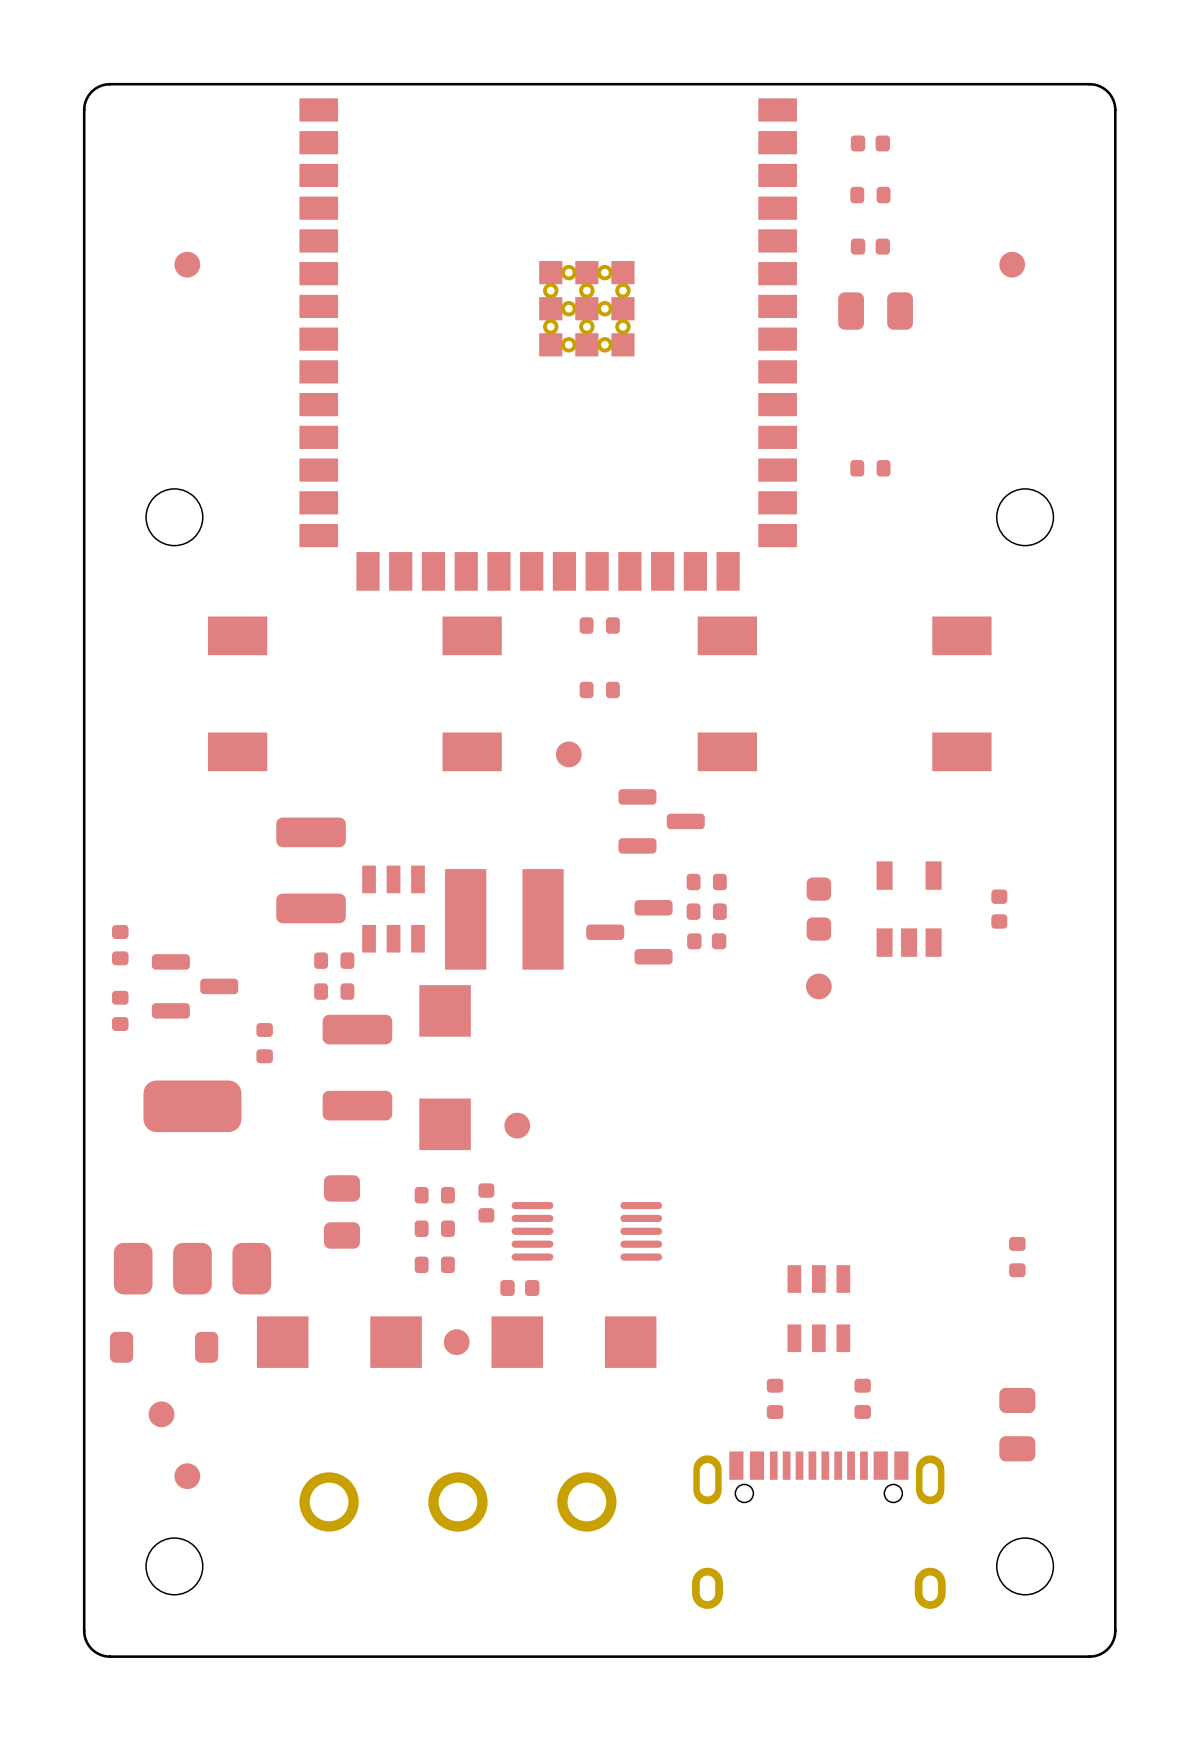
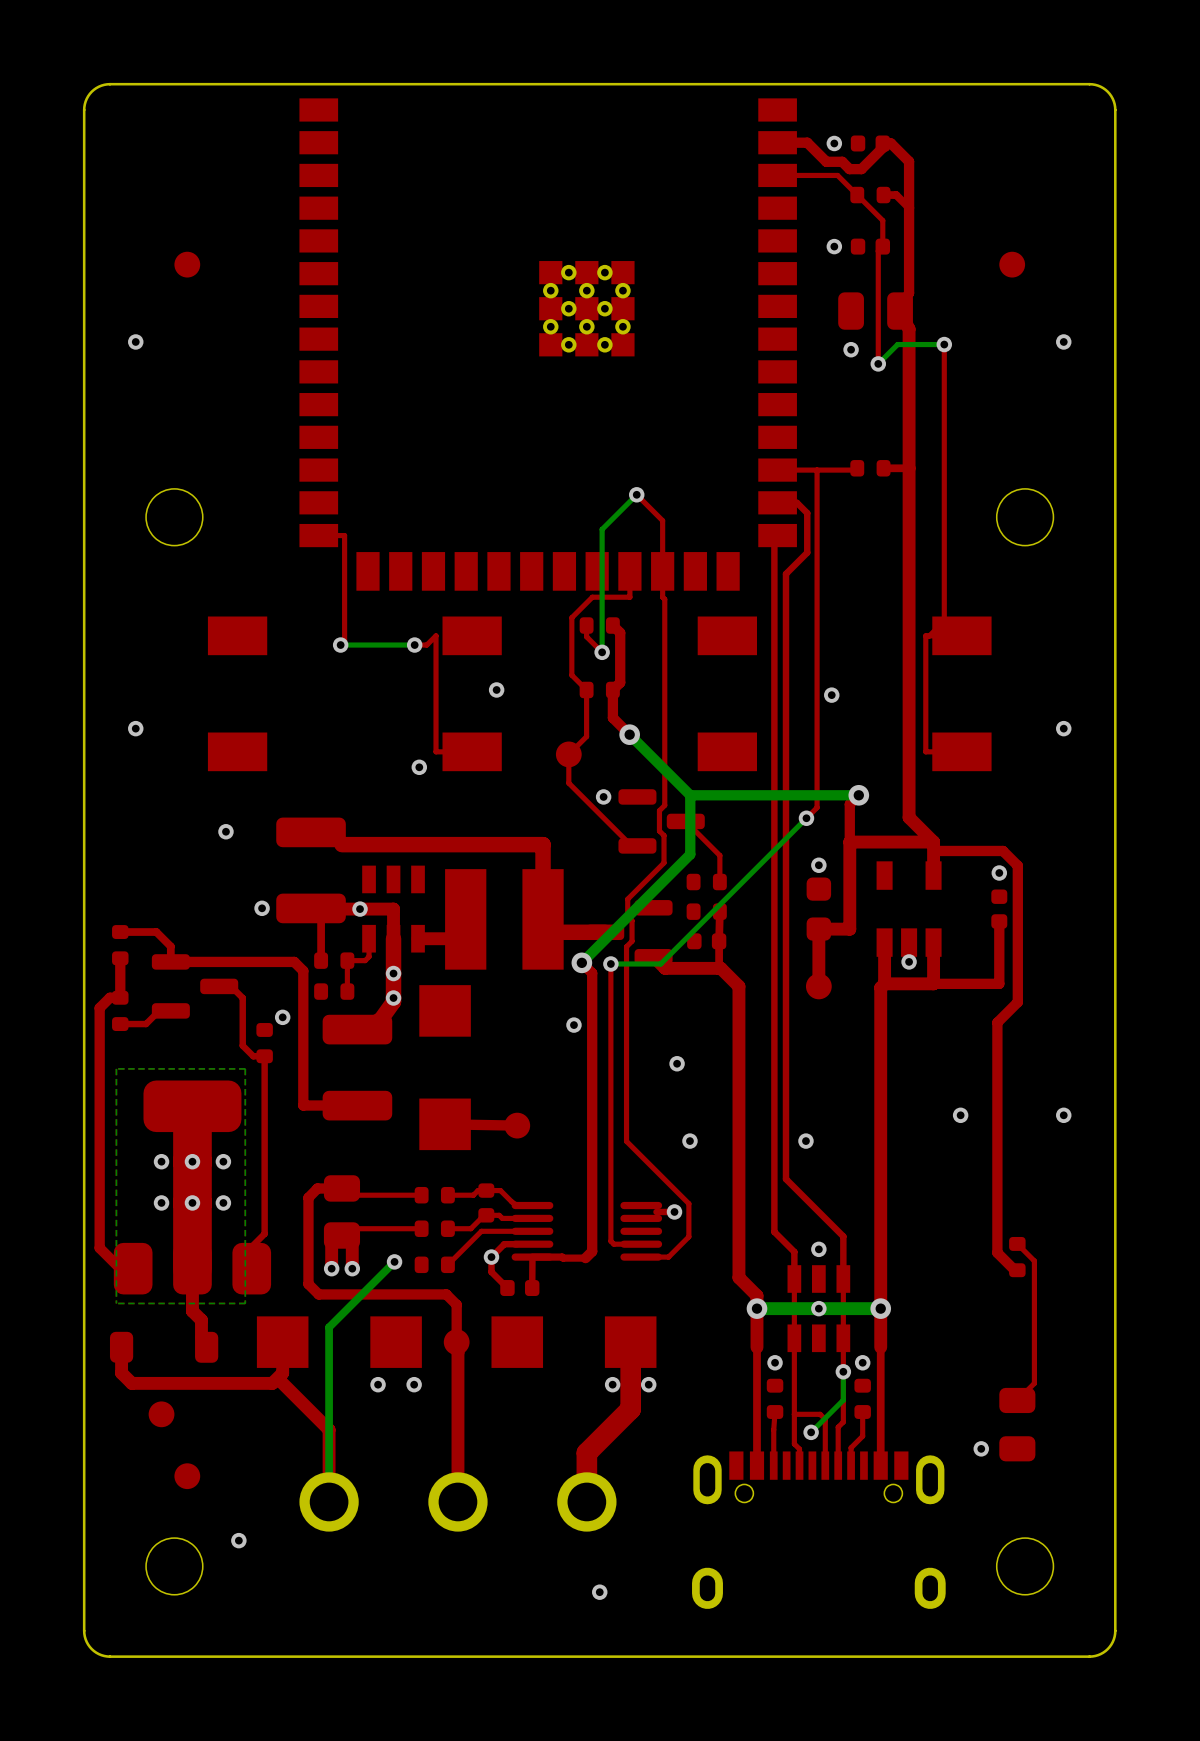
top track: none -> (777, 142) (807, 142) (826, 161) (842, 161) (849, 169) (861, 169) (882, 147) (882, 143) (891, 143) (909, 161) (909, 292) (900, 311) (909, 329) (909, 817) (933, 842)
via: none -> (834, 143)
top track: none -> (777, 175) (837, 175) (882, 220) (882, 246) (878, 251) (878, 363)
top track: none -> (883, 195) (896, 195) (909, 207)
via: none -> (834, 246)
via: none -> (135, 341)
via: none -> (1063, 341)
top track: none -> (944, 344) (944, 621) (929, 635)
bottom track: none -> (944, 344) (897, 344) (878, 363)
via: none -> (944, 344)
via: none -> (851, 349)
via: none -> (878, 363)
top track: none -> (857, 468) (855, 470) (777, 470)
top track: none -> (909, 468) (883, 468)
top track: none -> (817, 470) (817, 807) (806, 818)
top track: none -> (636, 494) (662, 520) (662, 597) (664, 599) (664, 805) (659, 810) (659, 831) (664, 835) (664, 862) (627, 899) (627, 916) (632, 920) (632, 941) (626, 946) (626, 1141) (688, 1203) (688, 1236) (668, 1257) (641, 1257)
bottom track: none -> (636, 494) (602, 529) (602, 652)
via: none -> (636, 494)
top track: none -> (777, 502) (796, 502) (807, 513) (807, 552) (785, 573) (785, 1179) (843, 1236) (843, 1422) (838, 1427) (838, 1465)
top track: none -> (318, 535) (344, 535) (344, 641) (340, 645)
top track: none -> (774, 535) (774, 1231) (794, 1251) (794, 1443) (799, 1449) (799, 1465)
top track: none -> (629, 571) (629, 597) (592, 597) (571, 617) (571, 675) (586, 689) (586, 736) (568, 754) (568, 783) (631, 845) (637, 845)
top track: none -> (586, 625) (586, 636) (602, 652)
top track: none -> (612, 625) (620, 632) (620, 682) (612, 689) (612, 717) (629, 734)
top track: none -> (961, 635) (925, 635) (925, 751) (961, 751)
via: none -> (340, 645)
top track: none -> (414, 645) (426, 645) (436, 635) (436, 751) (472, 751)
bottom track: none -> (414, 645) (340, 645)
via: none -> (414, 645)
via: none -> (602, 652)
via: none -> (496, 689)
via: none -> (831, 695)
via: none -> (135, 728)
via: none -> (1063, 728)
bottom track: none -> (629, 734) (690, 795)
via: none -> (629, 734)
via: none -> (419, 767)
bottom track: none -> (690, 795) (690, 854) (581, 962)
top track: none -> (858, 795) (849, 804) (849, 842)
bottom track: none -> (858, 795) (690, 795)
via: none -> (858, 795)
via: none -> (603, 796)
bottom track: none -> (806, 818) (660, 963) (610, 963)
via: none -> (806, 818)
top track: none -> (685, 821) (719, 855) (719, 882)
via: none -> (225, 831)
top track: none -> (849, 842) (849, 929) (818, 929) (818, 986)
top track: none -> (933, 842) (933, 875) (933, 850) (1003, 850) (1017, 865) (1017, 1002) (997, 1022) (997, 1252) (1014, 1270) (1017, 1270)
top track: none -> (933, 842) (849, 842)
top track: none -> (341, 844) (543, 844) (543, 878)
via: none -> (818, 865)
via: none -> (999, 872)
via: none -> (262, 908)
top track: none -> (341, 909) (393, 909) (393, 1001) (380, 1019) (370, 1025)
via: none -> (360, 909)
top track: none -> (719, 911) (719, 968)
top track: none -> (321, 916) (321, 960)
top track: none -> (999, 921) (999, 983) (933, 983)
top track: none -> (120, 932) (156, 932) (170, 946) (170, 961) (294, 961) (303, 970) (303, 1105) (326, 1105)
top track: none -> (605, 932) (563, 932)
top track: none -> (369, 938) (369, 956) (365, 960) (347, 960) (347, 991)
top track: none -> (455, 938) (418, 938)
top track: none -> (884, 942) (884, 983)
top track: none -> (933, 942) (933, 983)
top track: none -> (653, 956) (665, 968) (720, 968) (738, 986) (738, 1277) (756, 1295) (756, 1465)
top track: none -> (120, 958) (120, 997) (109, 997) (99, 1008) (99, 1248) (120, 1268) (133, 1268)
via: none -> (909, 961)
top track: none -> (581, 962) (592, 973) (592, 1251) (585, 1258) (532, 1257) (532, 1288)
via: none -> (581, 962)
top track: none -> (610, 963) (610, 1241) (613, 1244) (641, 1244)
via: none -> (610, 963)
via: none -> (393, 973)
top track: none -> (884, 983) (880, 987) (880, 1465)
top track: none -> (933, 983) (884, 983)
top track: none -> (219, 986) (231, 986) (242, 998) (242, 1045) (253, 1056) (264, 1056) (264, 1233) (251, 1246) (251, 1268)
via: none -> (393, 998)
top track: none -> (170, 1010) (156, 1013) (146, 1024) (120, 1024)
via: none -> (282, 1017)
via: none -> (573, 1025)
via: none -> (677, 1063)
bottom zone outline: none -> (245, 1068) (116, 1068) (116, 1303) (245, 1303) (245, 1068)
top track: none -> (192, 1106) (192, 1311) (201, 1320) (201, 1336)
via: none -> (960, 1115)
via: none -> (1063, 1115)
top track: none -> (445, 1124) (517, 1125)
via: none -> (689, 1141)
via: none -> (805, 1141)
via: none -> (161, 1161)
via: none -> (192, 1161)
via: none -> (223, 1161)
top track: none -> (334, 1188) (317, 1188) (308, 1197) (308, 1284) (318, 1294) (446, 1294) (456, 1304) (457, 1501)
top track: none -> (421, 1195) (352, 1195)
top track: none -> (447, 1195) (473, 1195) (478, 1190) (500, 1190) (517, 1205) (532, 1205)
via: none -> (161, 1202)
via: none -> (192, 1202)
via: none -> (223, 1202)
top track: none -> (674, 1211) (656, 1211)
via: none -> (674, 1211)
top track: none -> (532, 1218) (502, 1218) (499, 1215) (486, 1215) (470, 1228) (447, 1228)
top track: none -> (421, 1228) (352, 1228)
top track: none -> (532, 1231) (481, 1231) (447, 1264)
top track: none -> (1017, 1243) (1034, 1261) (1034, 1383) (1017, 1400)
top track: none -> (331, 1244) (331, 1268)
top track: none -> (352, 1244) (352, 1268)
top track: none -> (517, 1244) (504, 1244) (491, 1257) (491, 1272) (507, 1288)
via: none -> (818, 1249)
via: none -> (491, 1257)
bottom track: none -> (394, 1261) (329, 1327) (329, 1501)
via: none -> (394, 1261)
via: none -> (331, 1268)
via: none -> (352, 1268)
via: none -> (756, 1308)
via: none -> (818, 1308)
bottom track: none -> (880, 1308) (756, 1308)
via: none -> (880, 1308)
top track: none -> (121, 1347) (121, 1373) (131, 1383) (272, 1383) (282, 1373)
top track: none -> (630, 1362) (630, 1409) (586, 1452) (586, 1501)
via: none -> (775, 1362)
via: none -> (862, 1362)
bottom track: none -> (843, 1371) (843, 1400) (811, 1432)
via: none -> (843, 1371)
top track: none -> (282, 1373) (282, 1383) (329, 1429) (329, 1501)
via: none -> (378, 1384)
via: none -> (414, 1384)
via: none -> (612, 1384)
via: none -> (648, 1384)
top track: none -> (775, 1412) (773, 1465)
top track: none -> (862, 1412) (862, 1436) (851, 1447) (851, 1465)
top track: none -> (794, 1414) (820, 1414) (825, 1419) (825, 1465)
via: none -> (811, 1432)
via: none -> (981, 1448)
via: none -> (238, 1540)
via: none -> (599, 1592)

